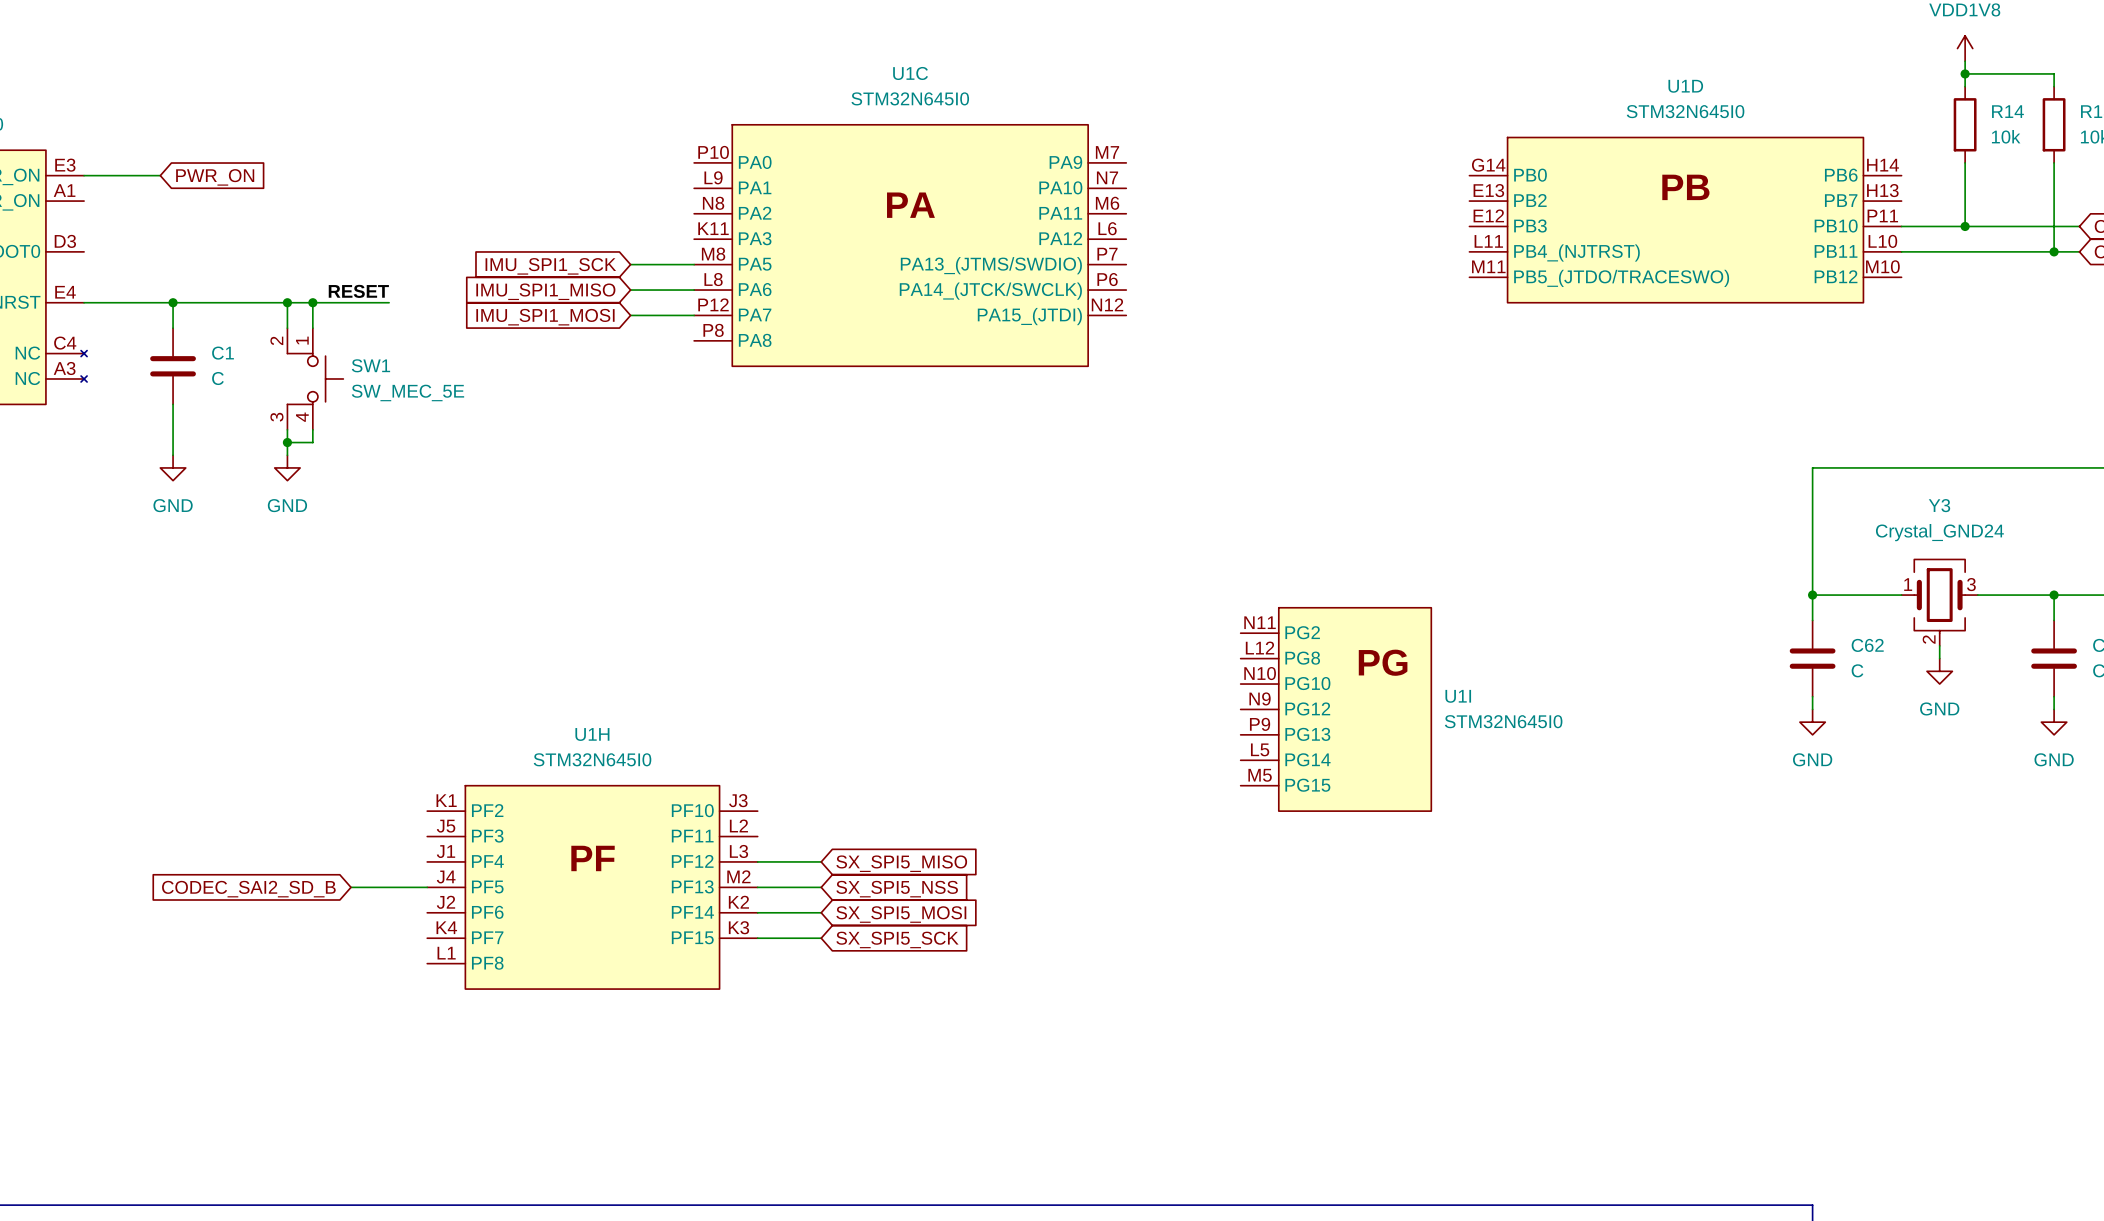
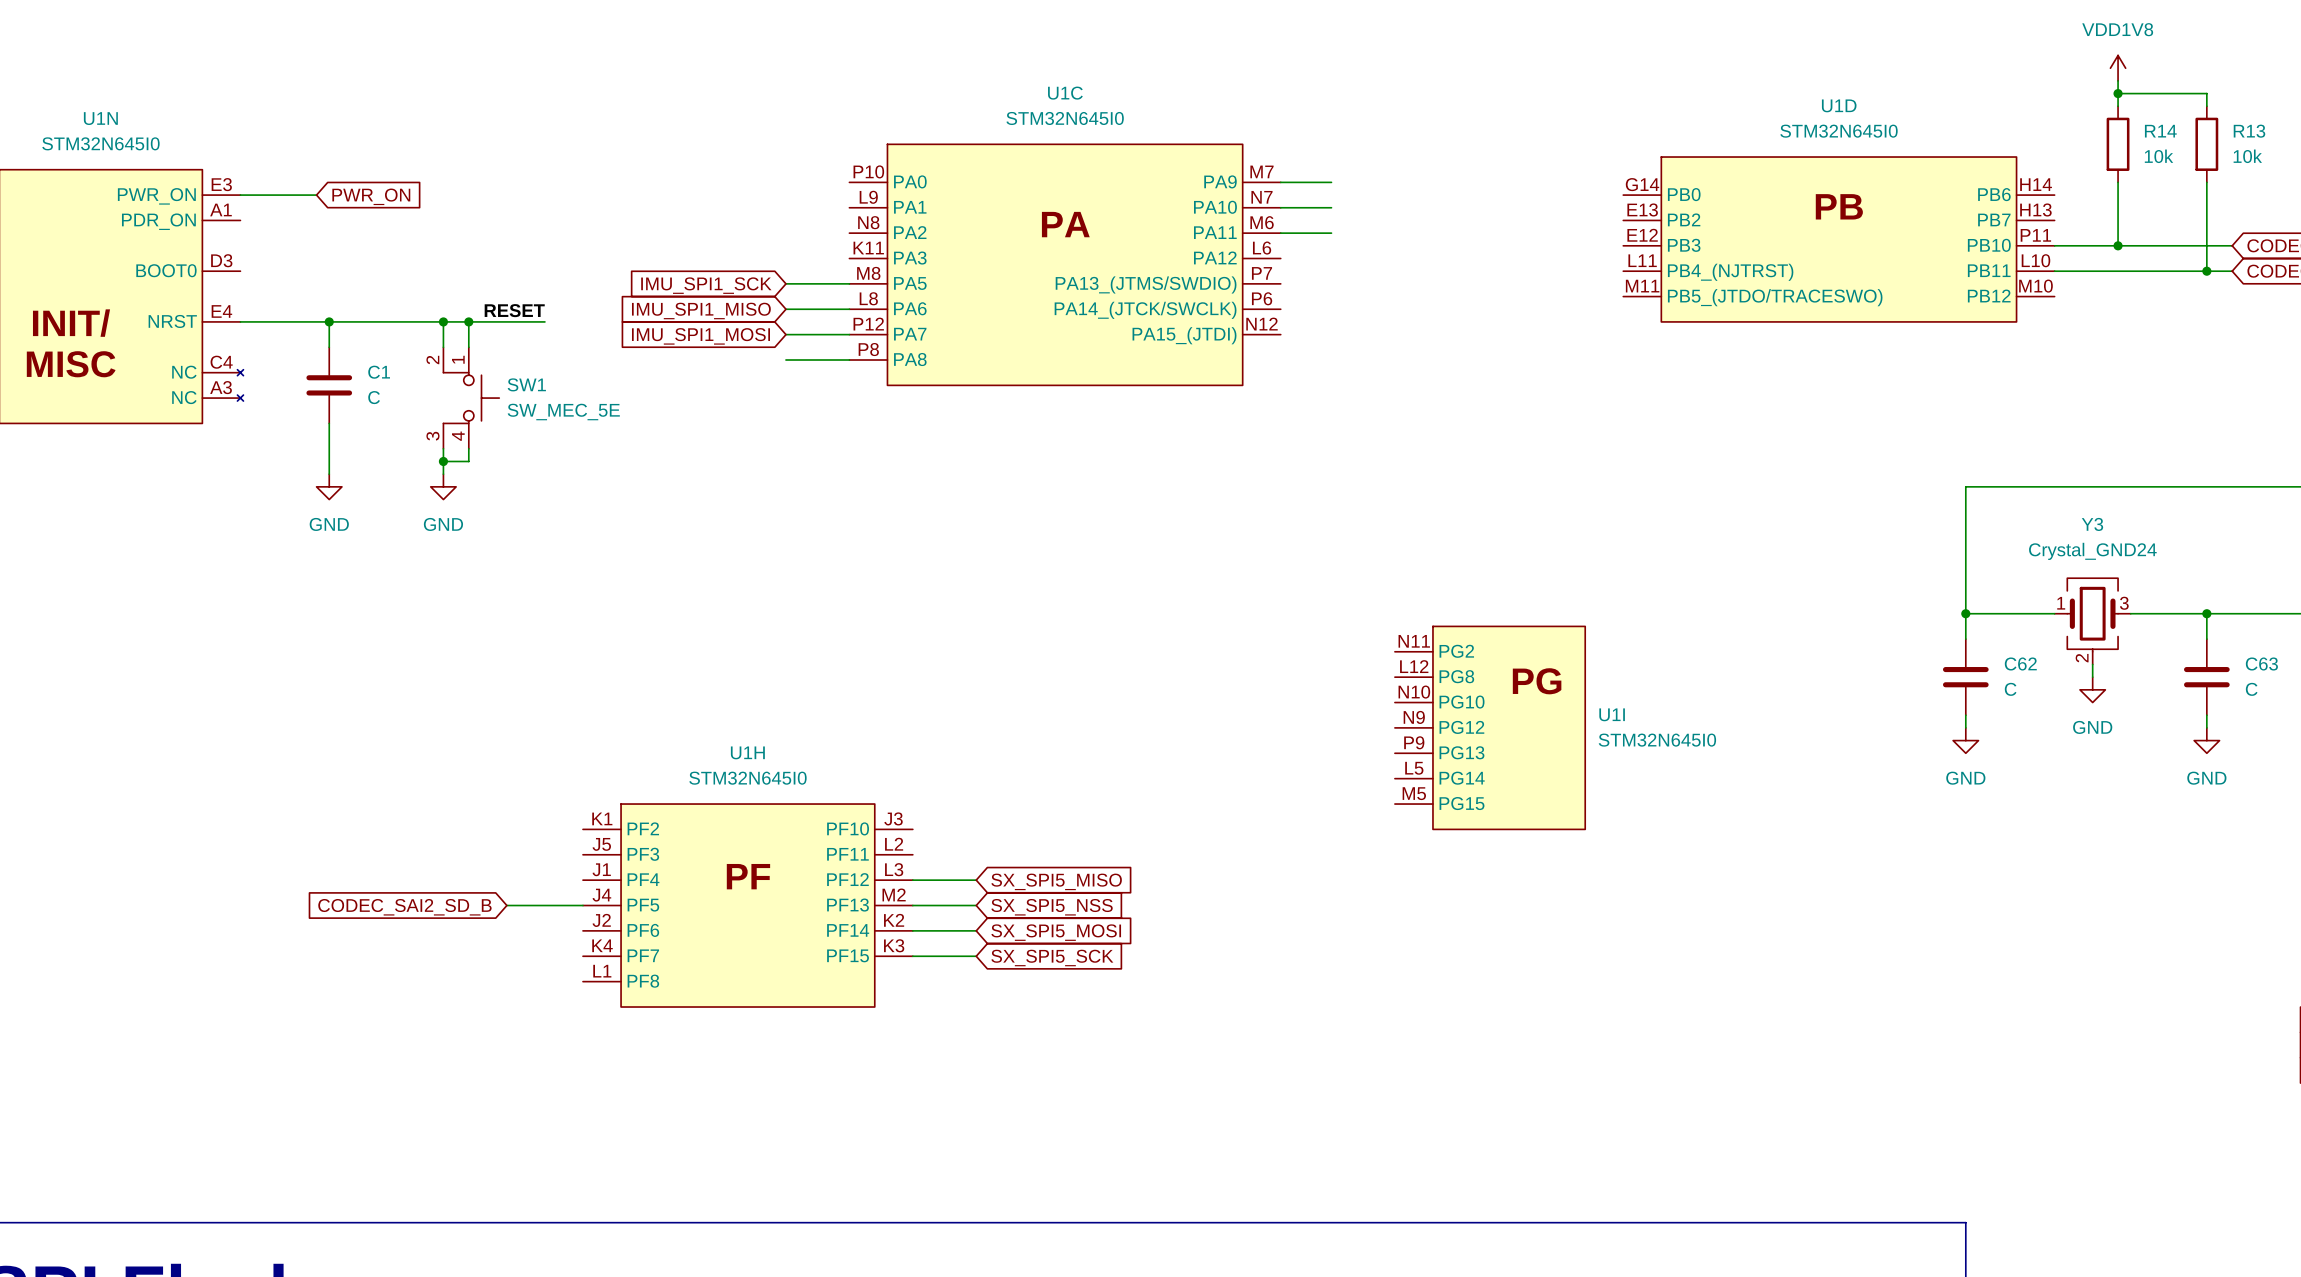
wire: none -> (1280, 182) (1331, 182)
wire: none -> (1280, 207) (1331, 207)
wire: none -> (1280, 233) (1331, 233)
wire: none -> (785, 360) (849, 360)

